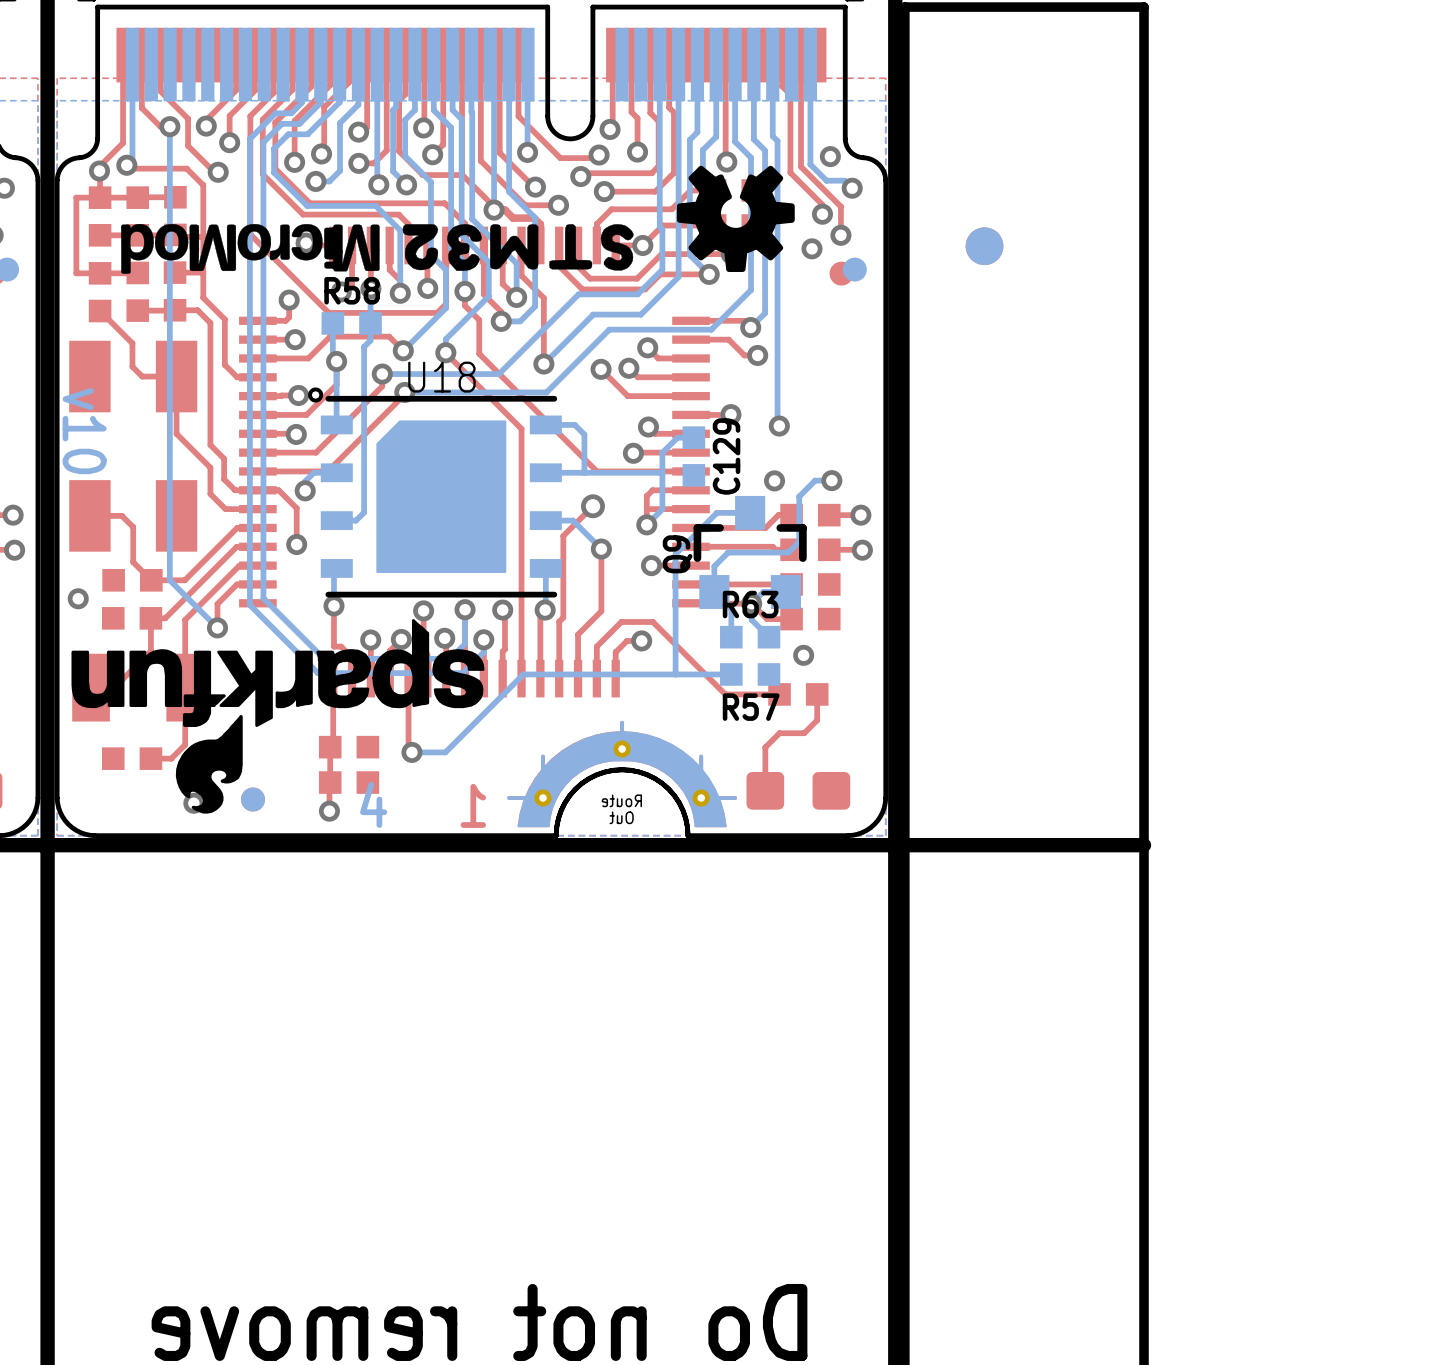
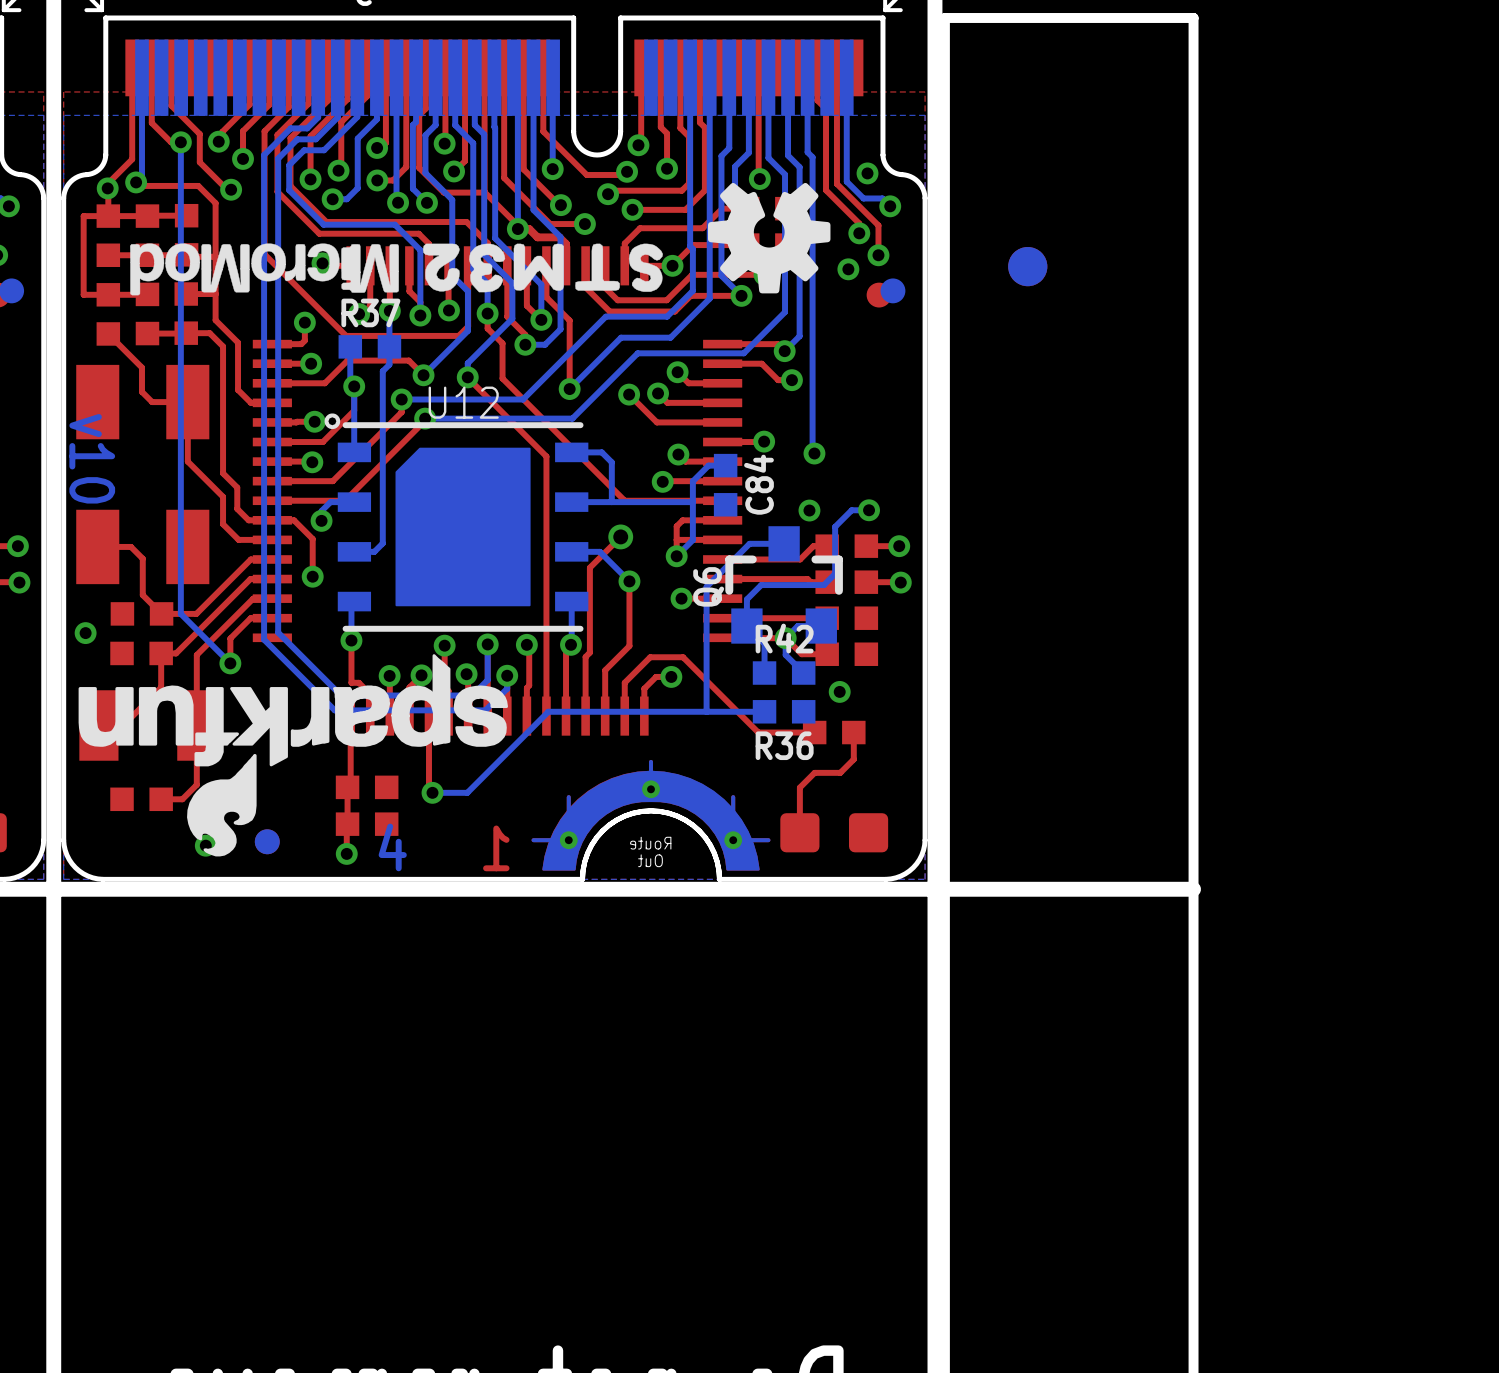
R58 name: R58 (352, 290) -> R37 (370, 312)
U18 name: U18 (441, 377) -> U12 (463, 402)
C129 name: C129 (726, 456) -> C84 (758, 484)
Q9 name: Q9 (677, 554) -> Q6 (708, 586)
R63 name: R63 (750, 604) -> R42 (784, 638)
R57 name: R57 (751, 707) -> R36 (784, 745)

